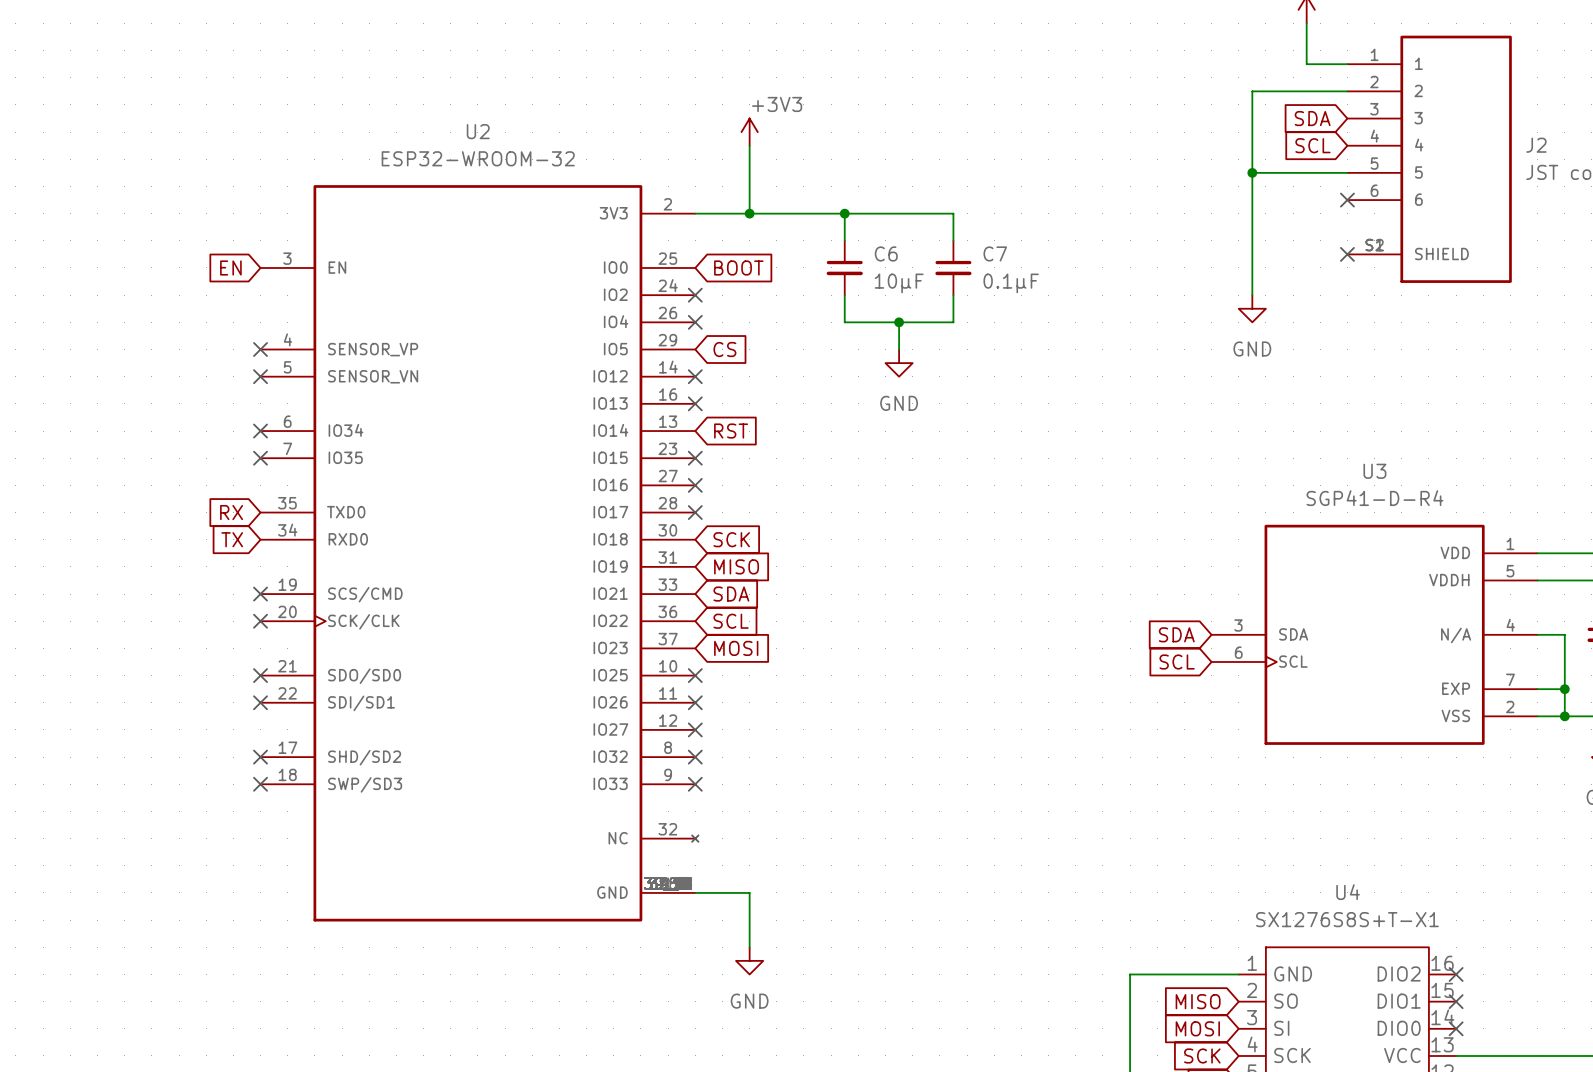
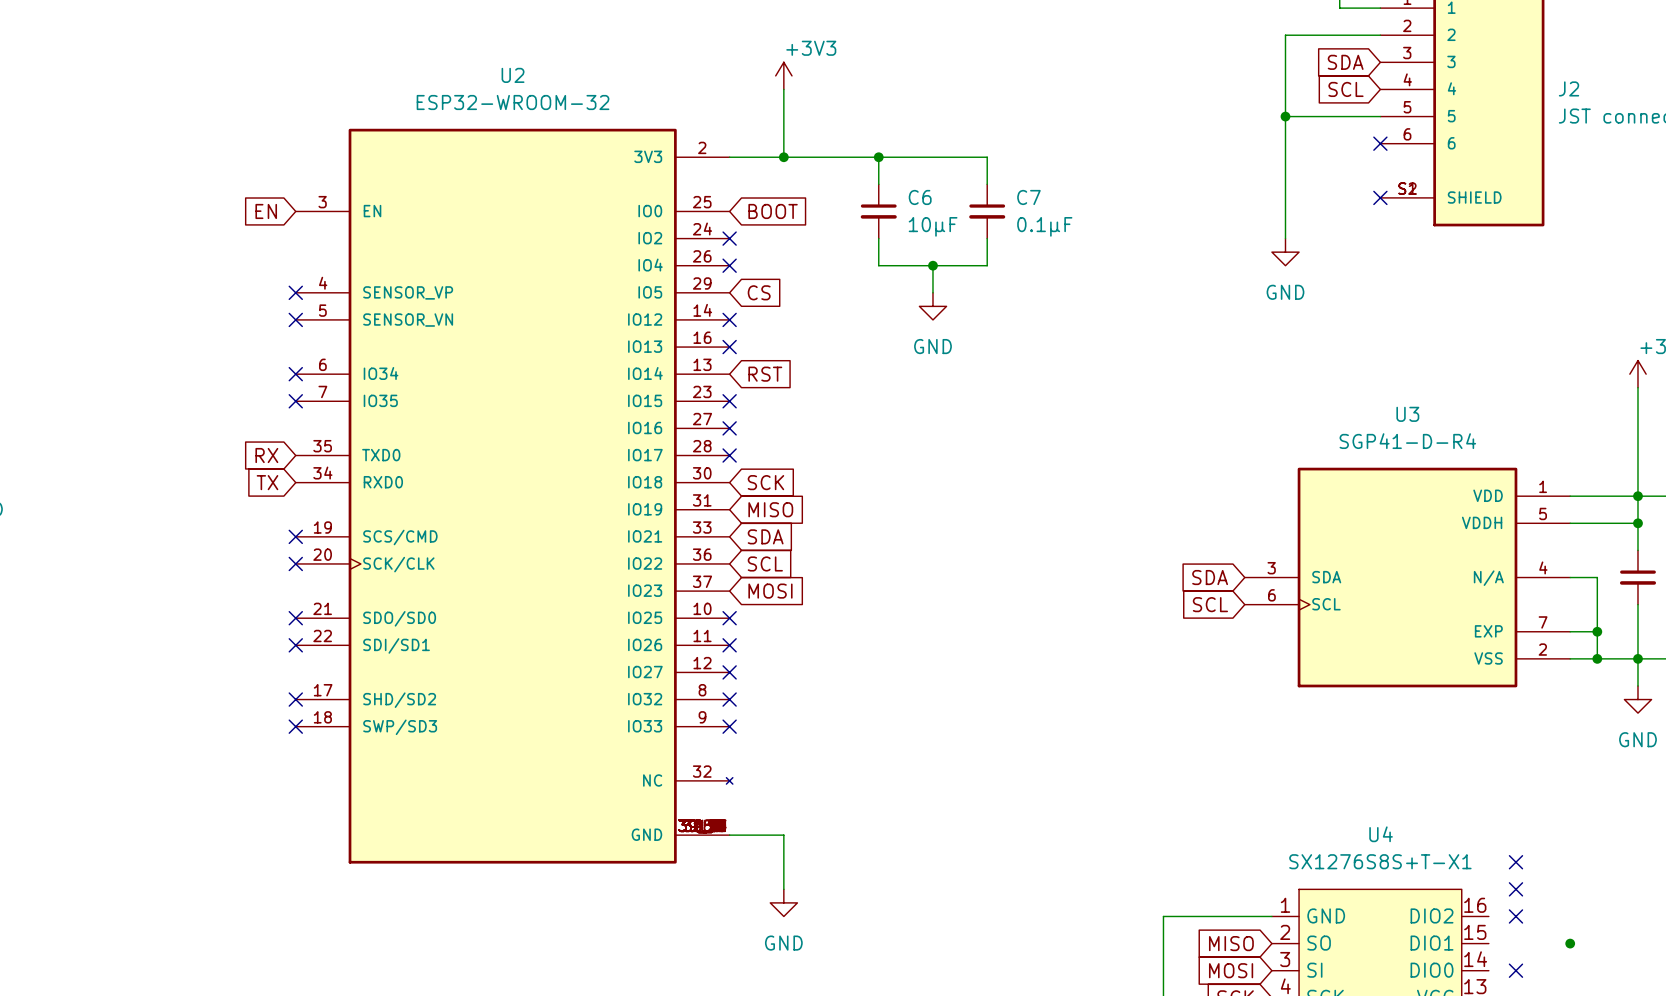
no-connect mark: none -> (1515, 862)
no-connect mark: none -> (1515, 889)
no-connect mark: (1456, 974) -> none
no-connect mark: none -> (1515, 916)
no-connect mark: (1456, 1001) -> none
junction: none -> (1570, 943)
no-connect mark: (1456, 1028) -> none
no-connect mark: none -> (1515, 970)

